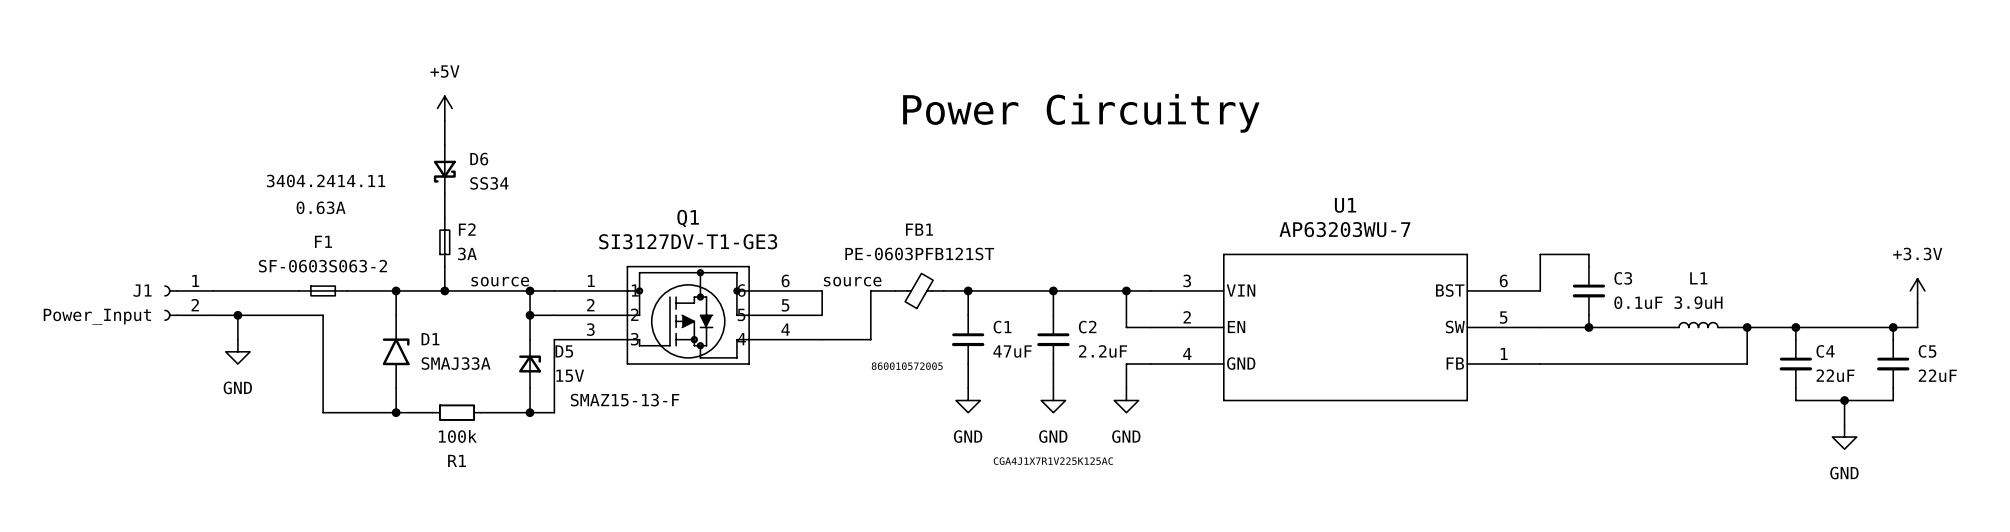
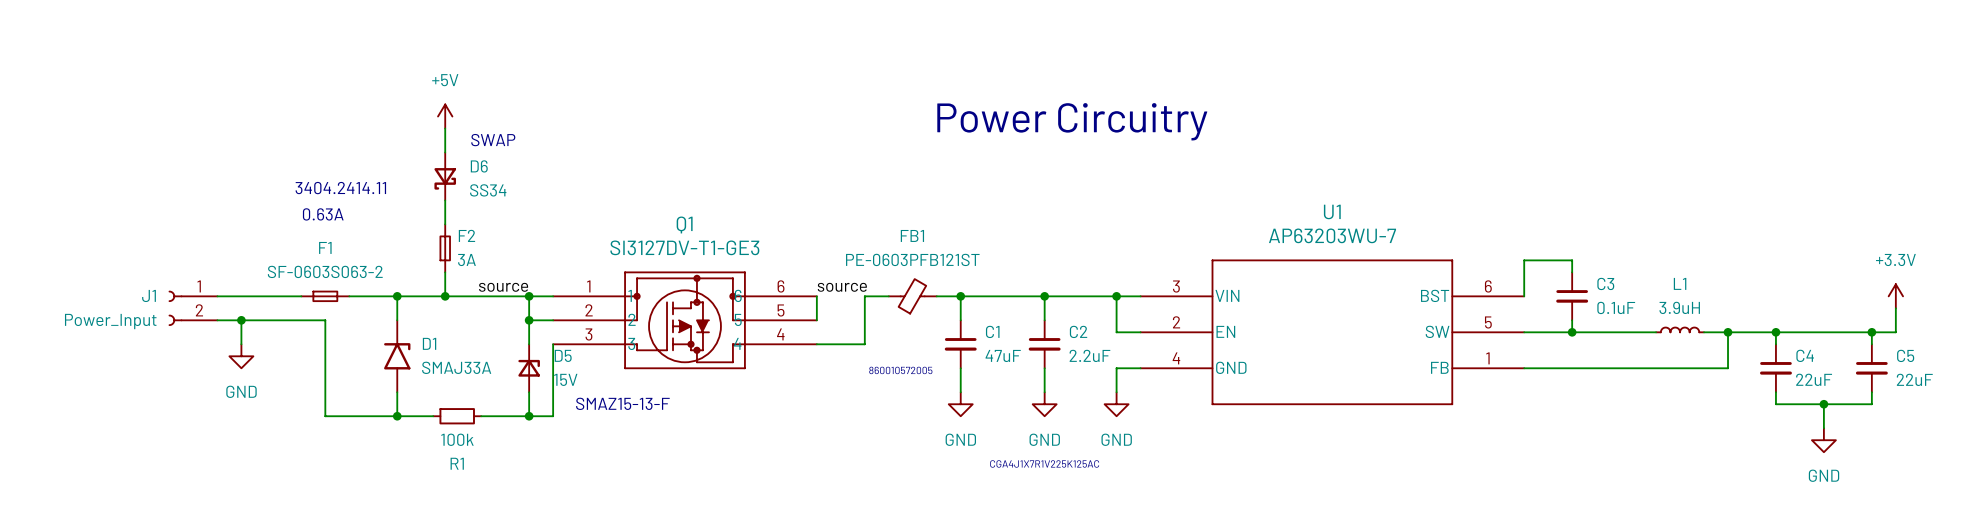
text: none -> SWAP (493, 140)

